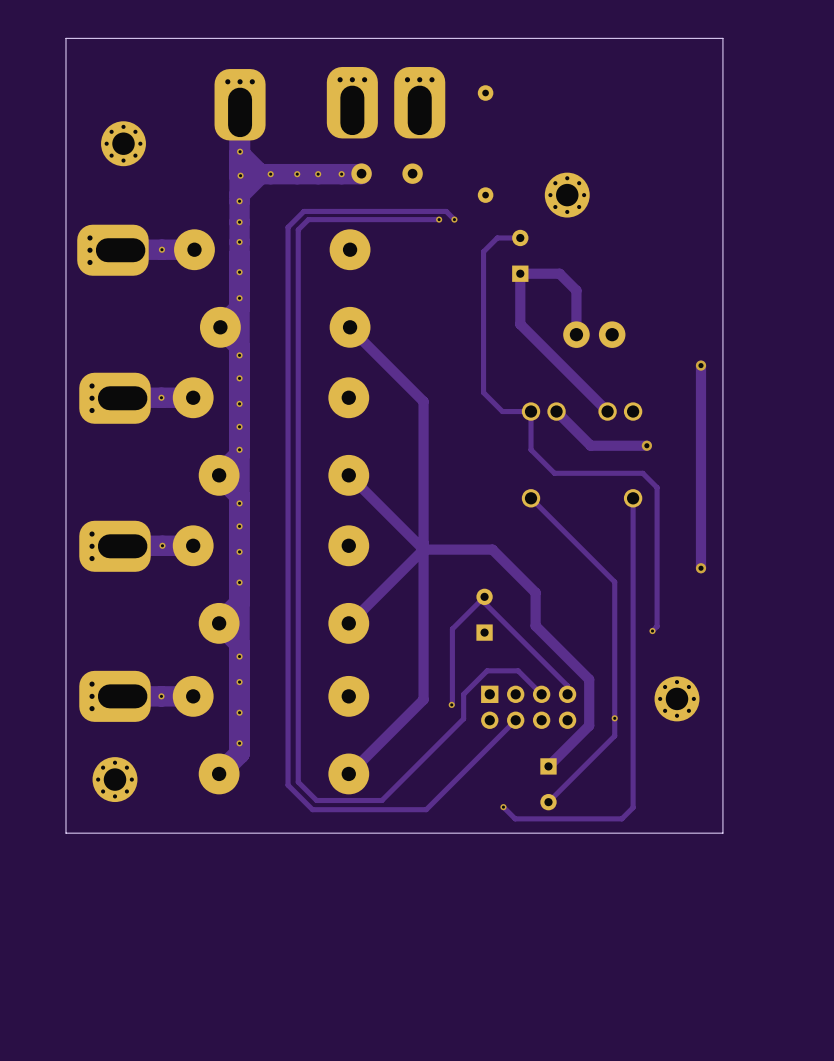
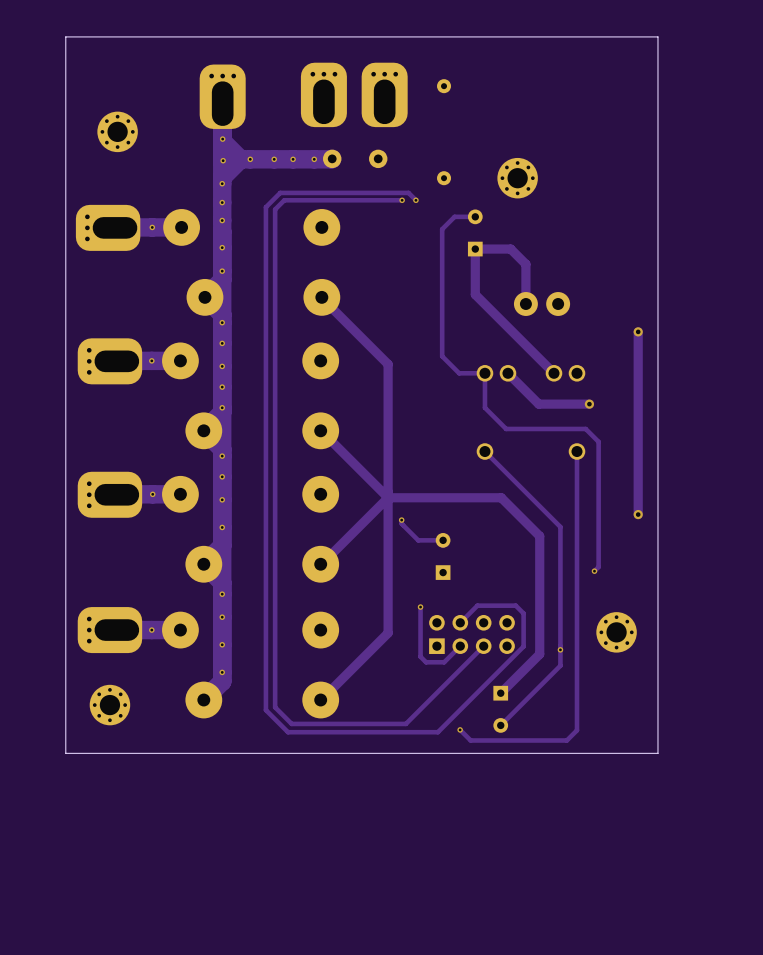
track: (492, 549) (535, 592) (535, 625) (589, 679) (589, 725) -> (450, 497) (501, 497) (539, 536) (539, 654) (537, 656)
via: none -> (401, 520)
track: (484, 596) (452, 629) (451, 704) -> (443, 540) (418, 540) (401, 523) (401, 520)
track: (484, 602) (567, 685) (567, 694) -> none
track: none -> (420, 607) (420, 656) (426, 662) (444, 662) (460, 646)
track: (541, 694) (518, 670) (487, 670) (463, 694) (463, 718) (381, 800) -> (483, 646) (405, 723) (350, 723)
part: none -> (471, 634)
via position: (451, 704) -> (420, 607)
part: (528, 707) -> none
track: (515, 720) (426, 809) -> (460, 622) (477, 605) (515, 605) (523, 613) (523, 646) (437, 732) (390, 732)

